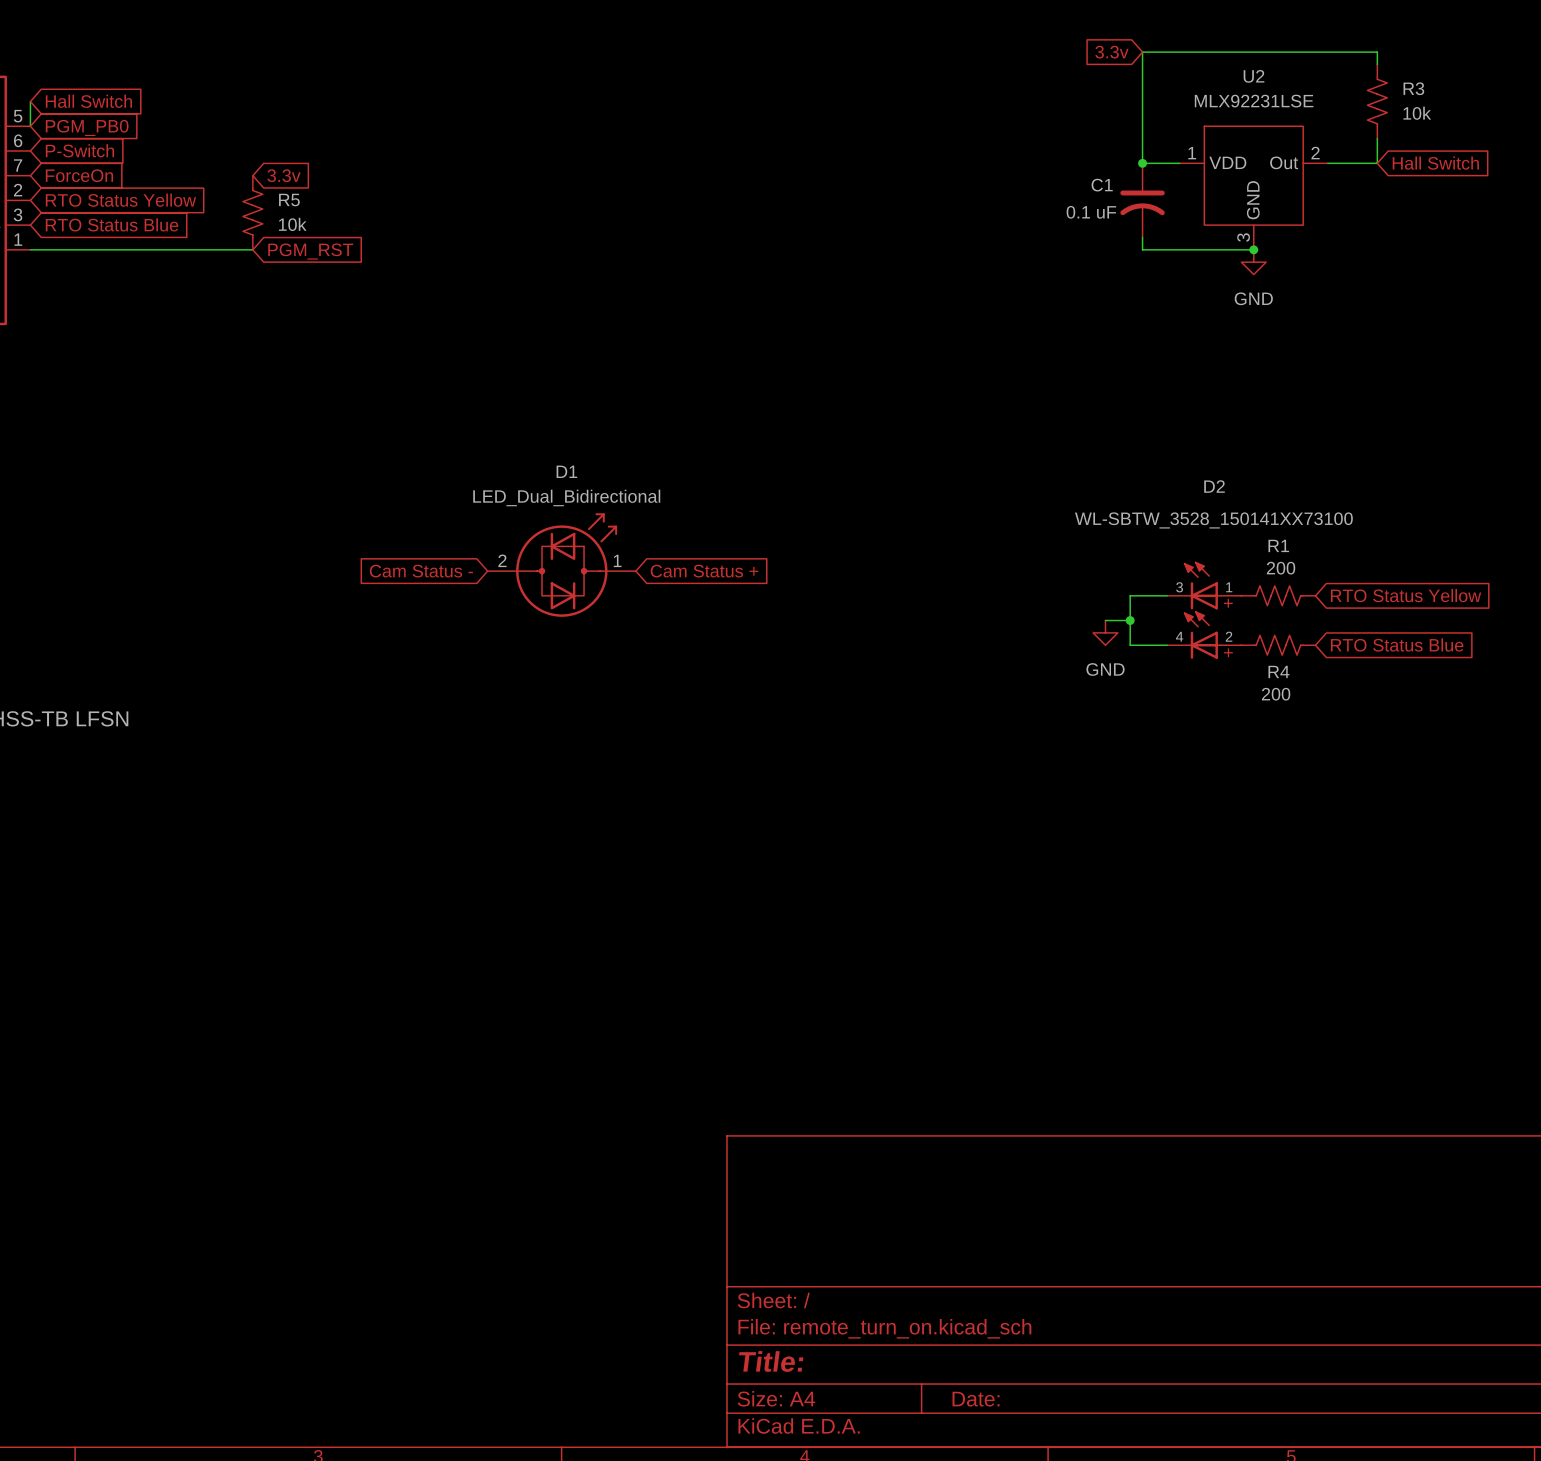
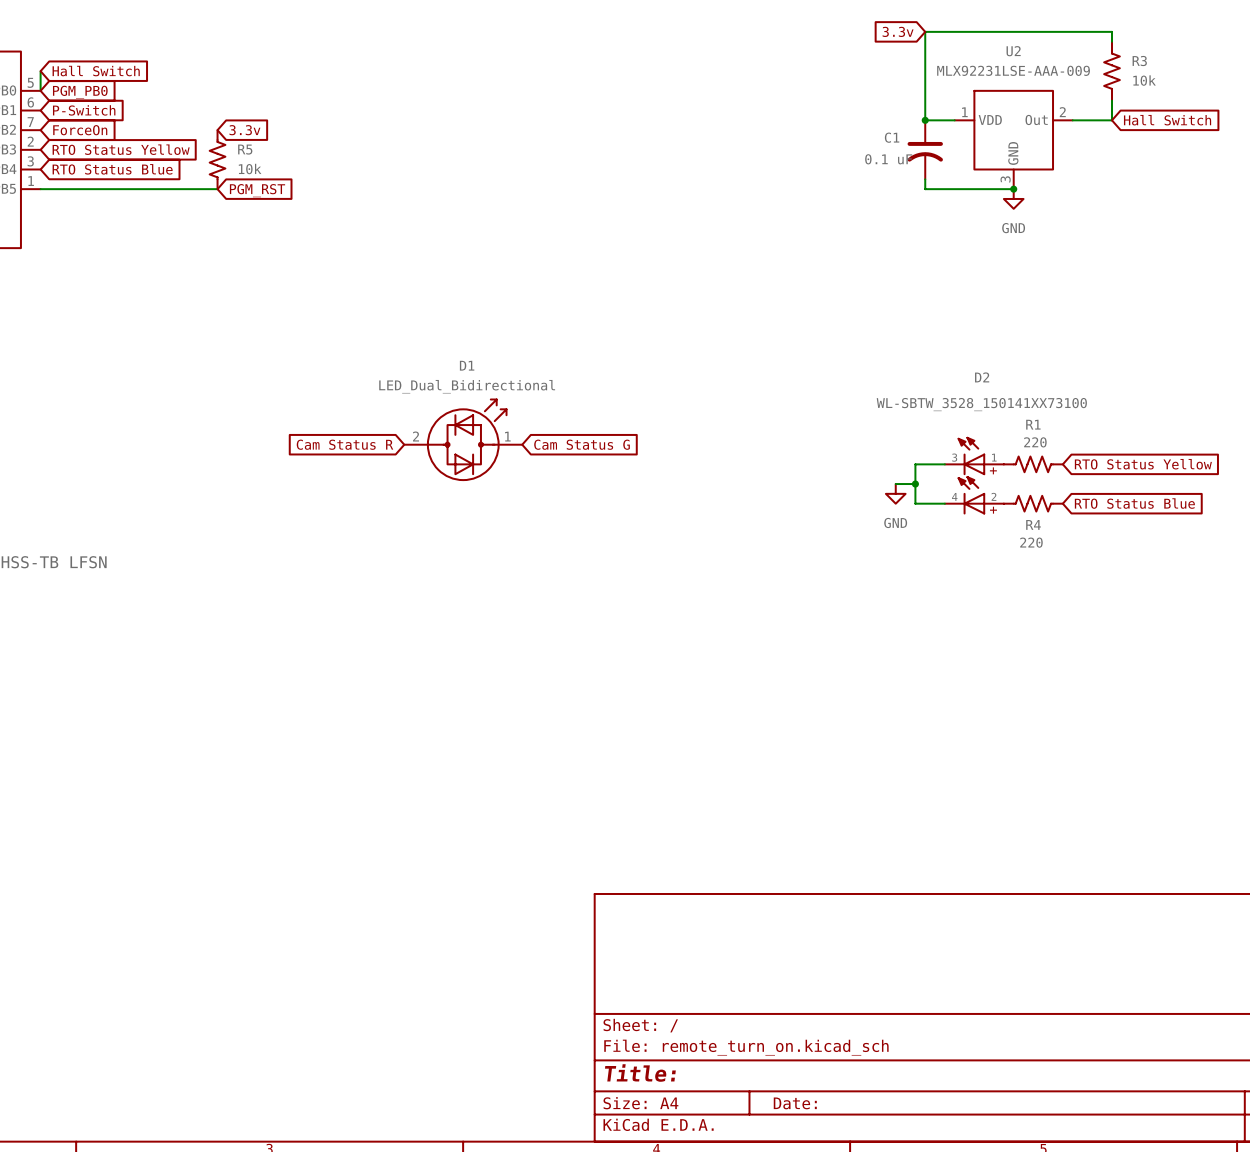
U2 value: MLX92231LSE (1254, 101) -> MLX92231LSE-AAA-009 (1013, 70)
R1 value: 200 (1281, 568) -> 220 (1035, 442)
global label: Cam Status - (421, 571) -> Cam Status R (344, 444)
global label: Cam Status + (704, 571) -> Cam Status G (582, 444)
R4 value: 200 (1276, 694) -> 220 (1031, 542)

